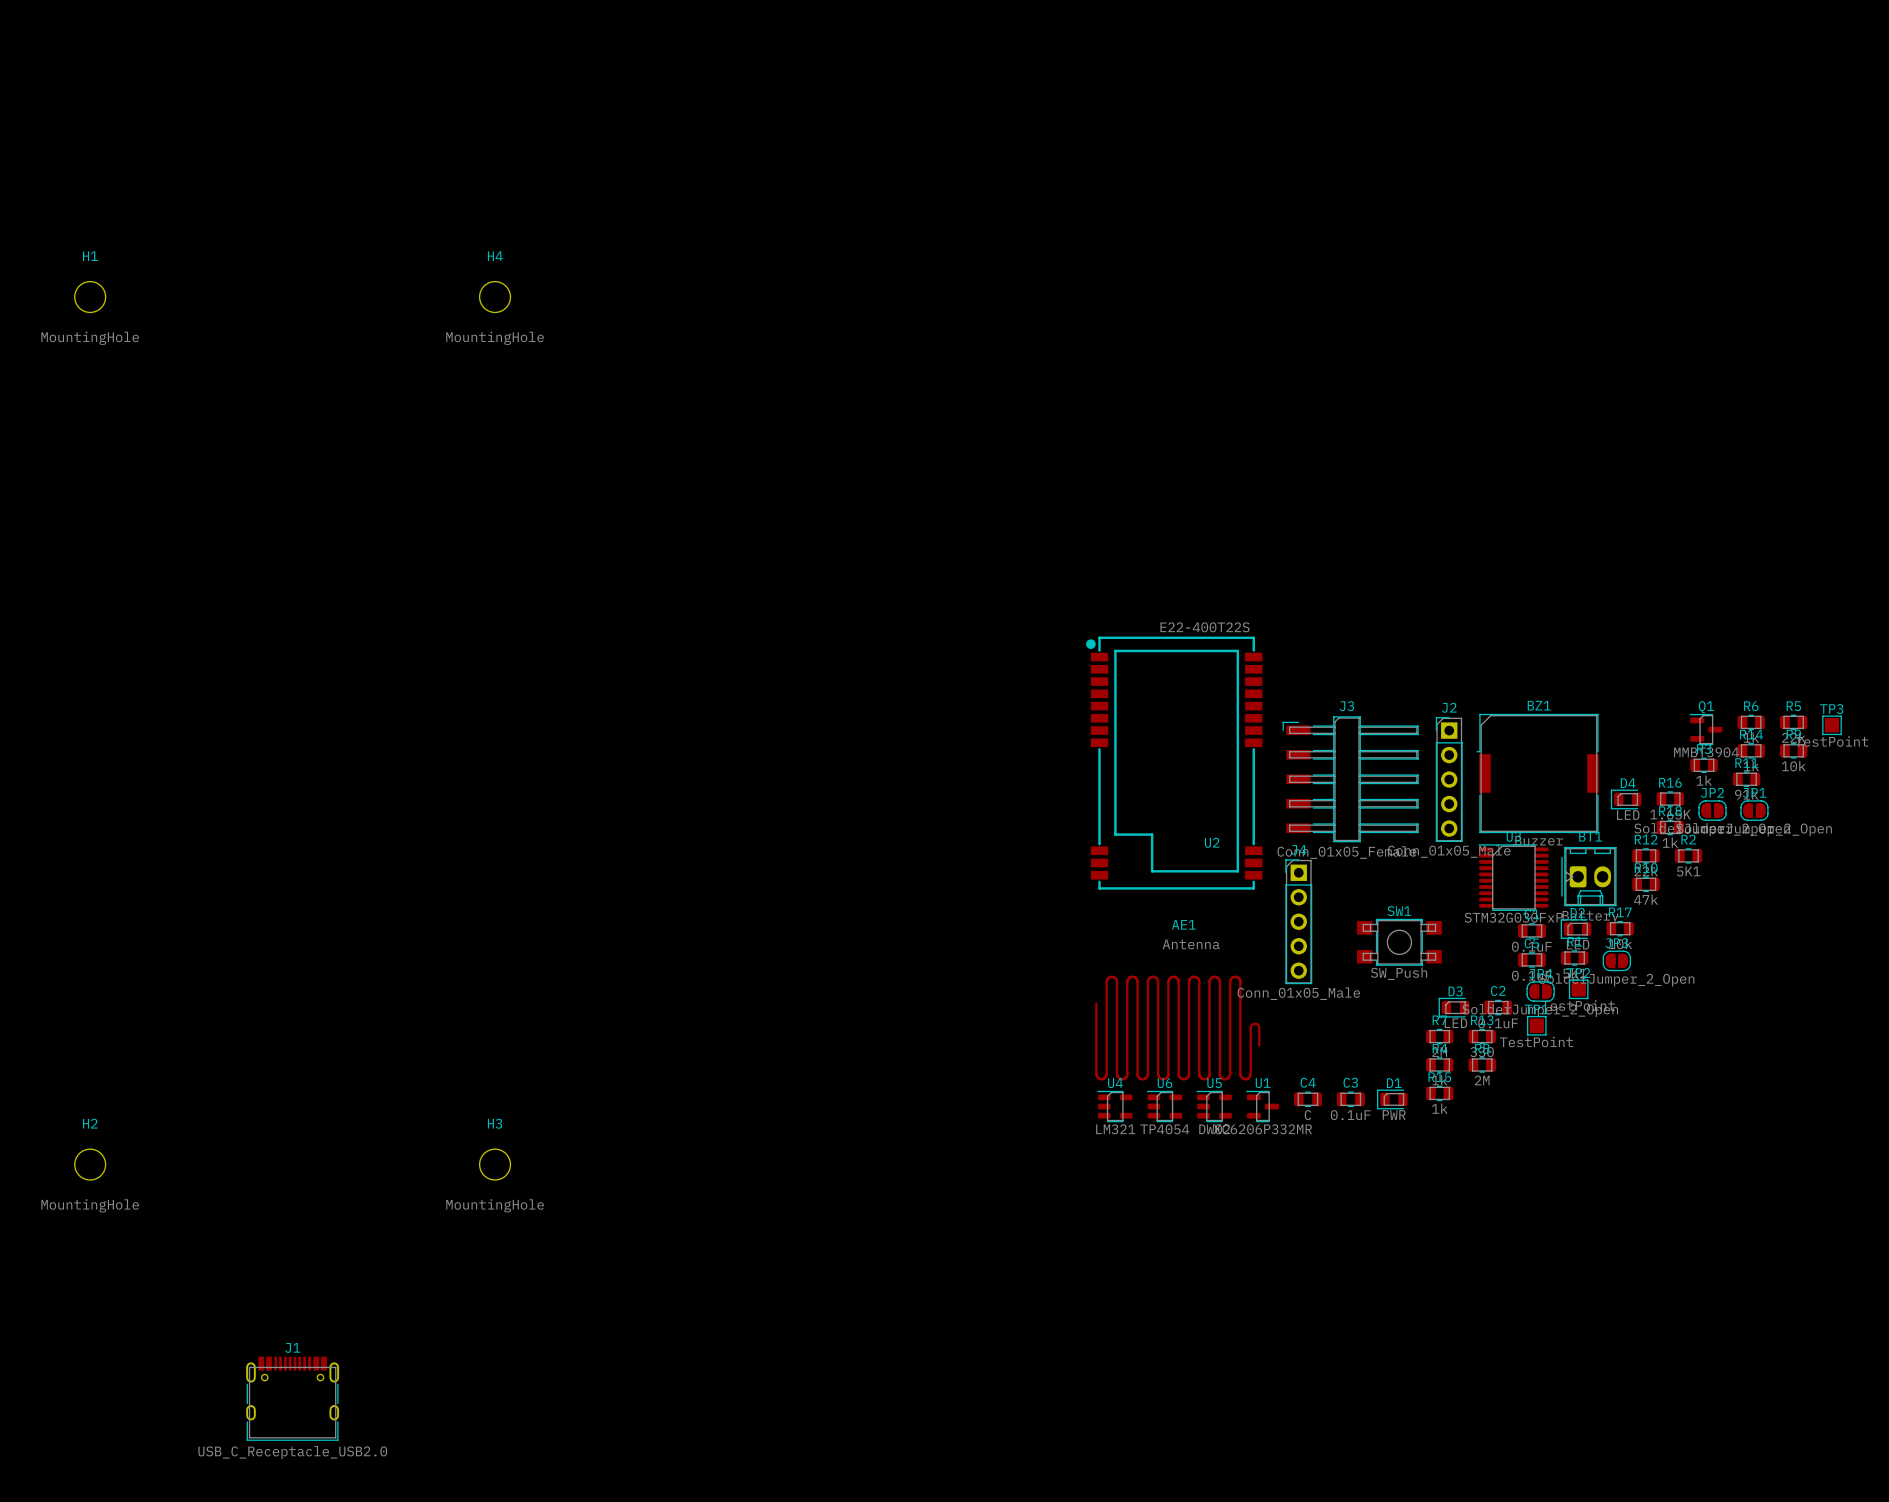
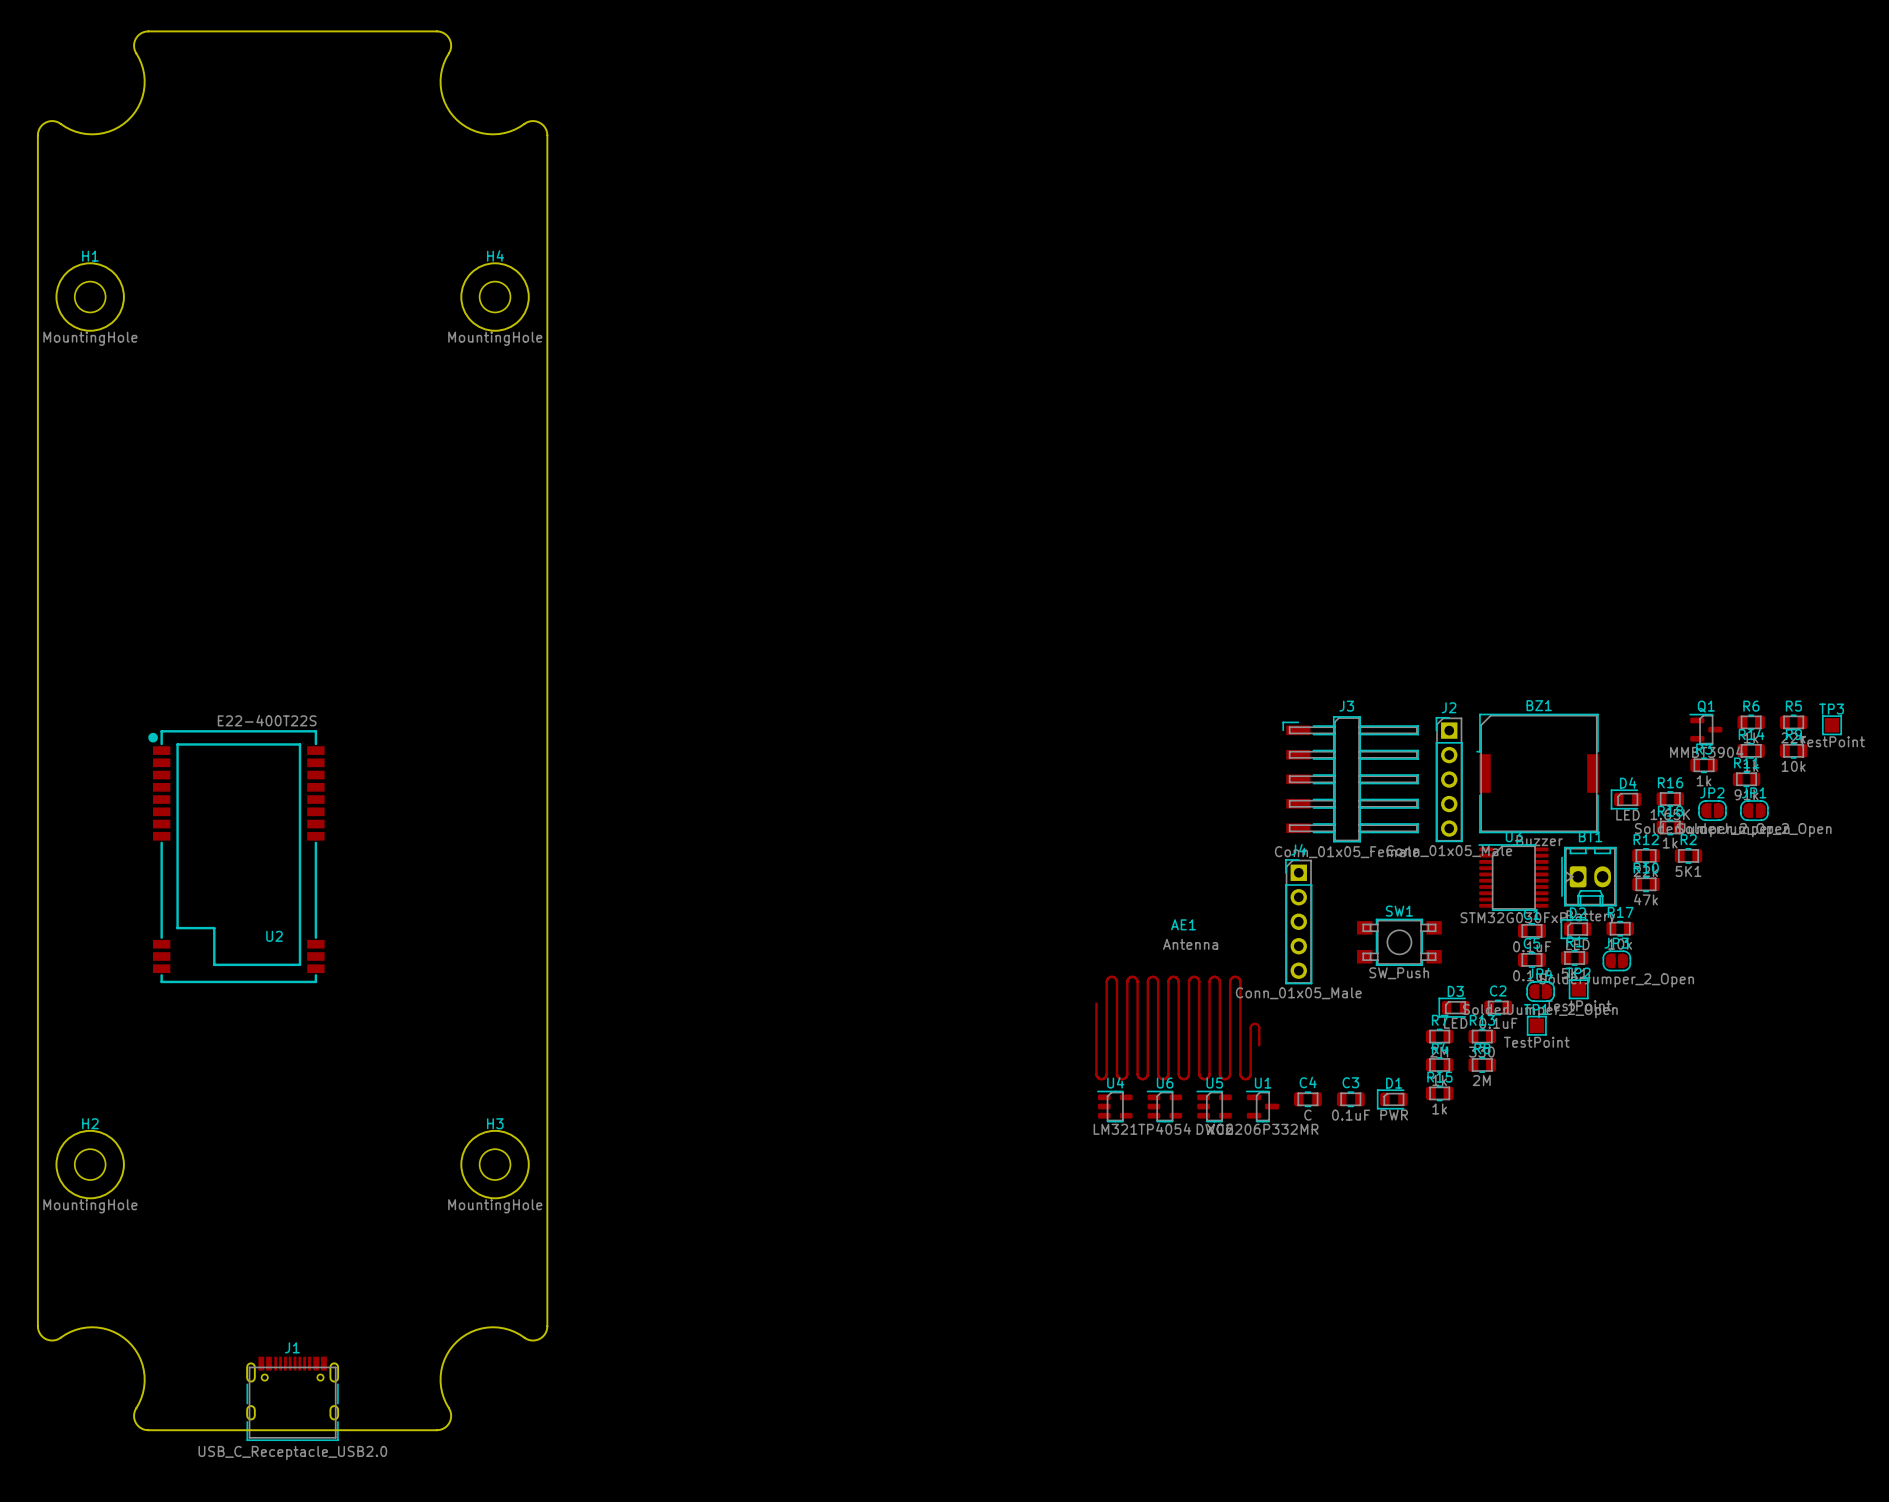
board edge: none -> (148, 31) (440, 31) (448, 37) (451, 45) (442, 68) (441, 91) (446, 106) (457, 120) (471, 129) (487, 134) (509, 131) (532, 121) (540, 123) (546, 131) (547, 1328) (543, 1335) (534, 1340) (527, 1339) (509, 1329) (492, 1327) (471, 1332) (457, 1341) (446, 1354) (441, 1370) (442, 1392) (451, 1416) (448, 1424) (440, 1429) (145, 1429) (137, 1425) (134, 1416) (143, 1392) (143, 1370) (138, 1354) (128, 1341) (114, 1332) (97, 1327) (75, 1329) (52, 1340) (44, 1338) (38, 1329) (38, 133) (42, 124) (50, 121) (57, 122) (75, 131) (92, 134) (108, 131) (128, 120) (138, 106) (144, 85) (143, 68) (134, 50) (134, 42) (138, 34) (148, 31)
round board edge: none -> [55, 262, 125, 332]
round board edge: none -> [460, 262, 530, 332]
U2 position: (1174, 763) -> (236, 856)
round board edge: none -> [55, 1129, 125, 1200]
round board edge: none -> [460, 1129, 530, 1200]

